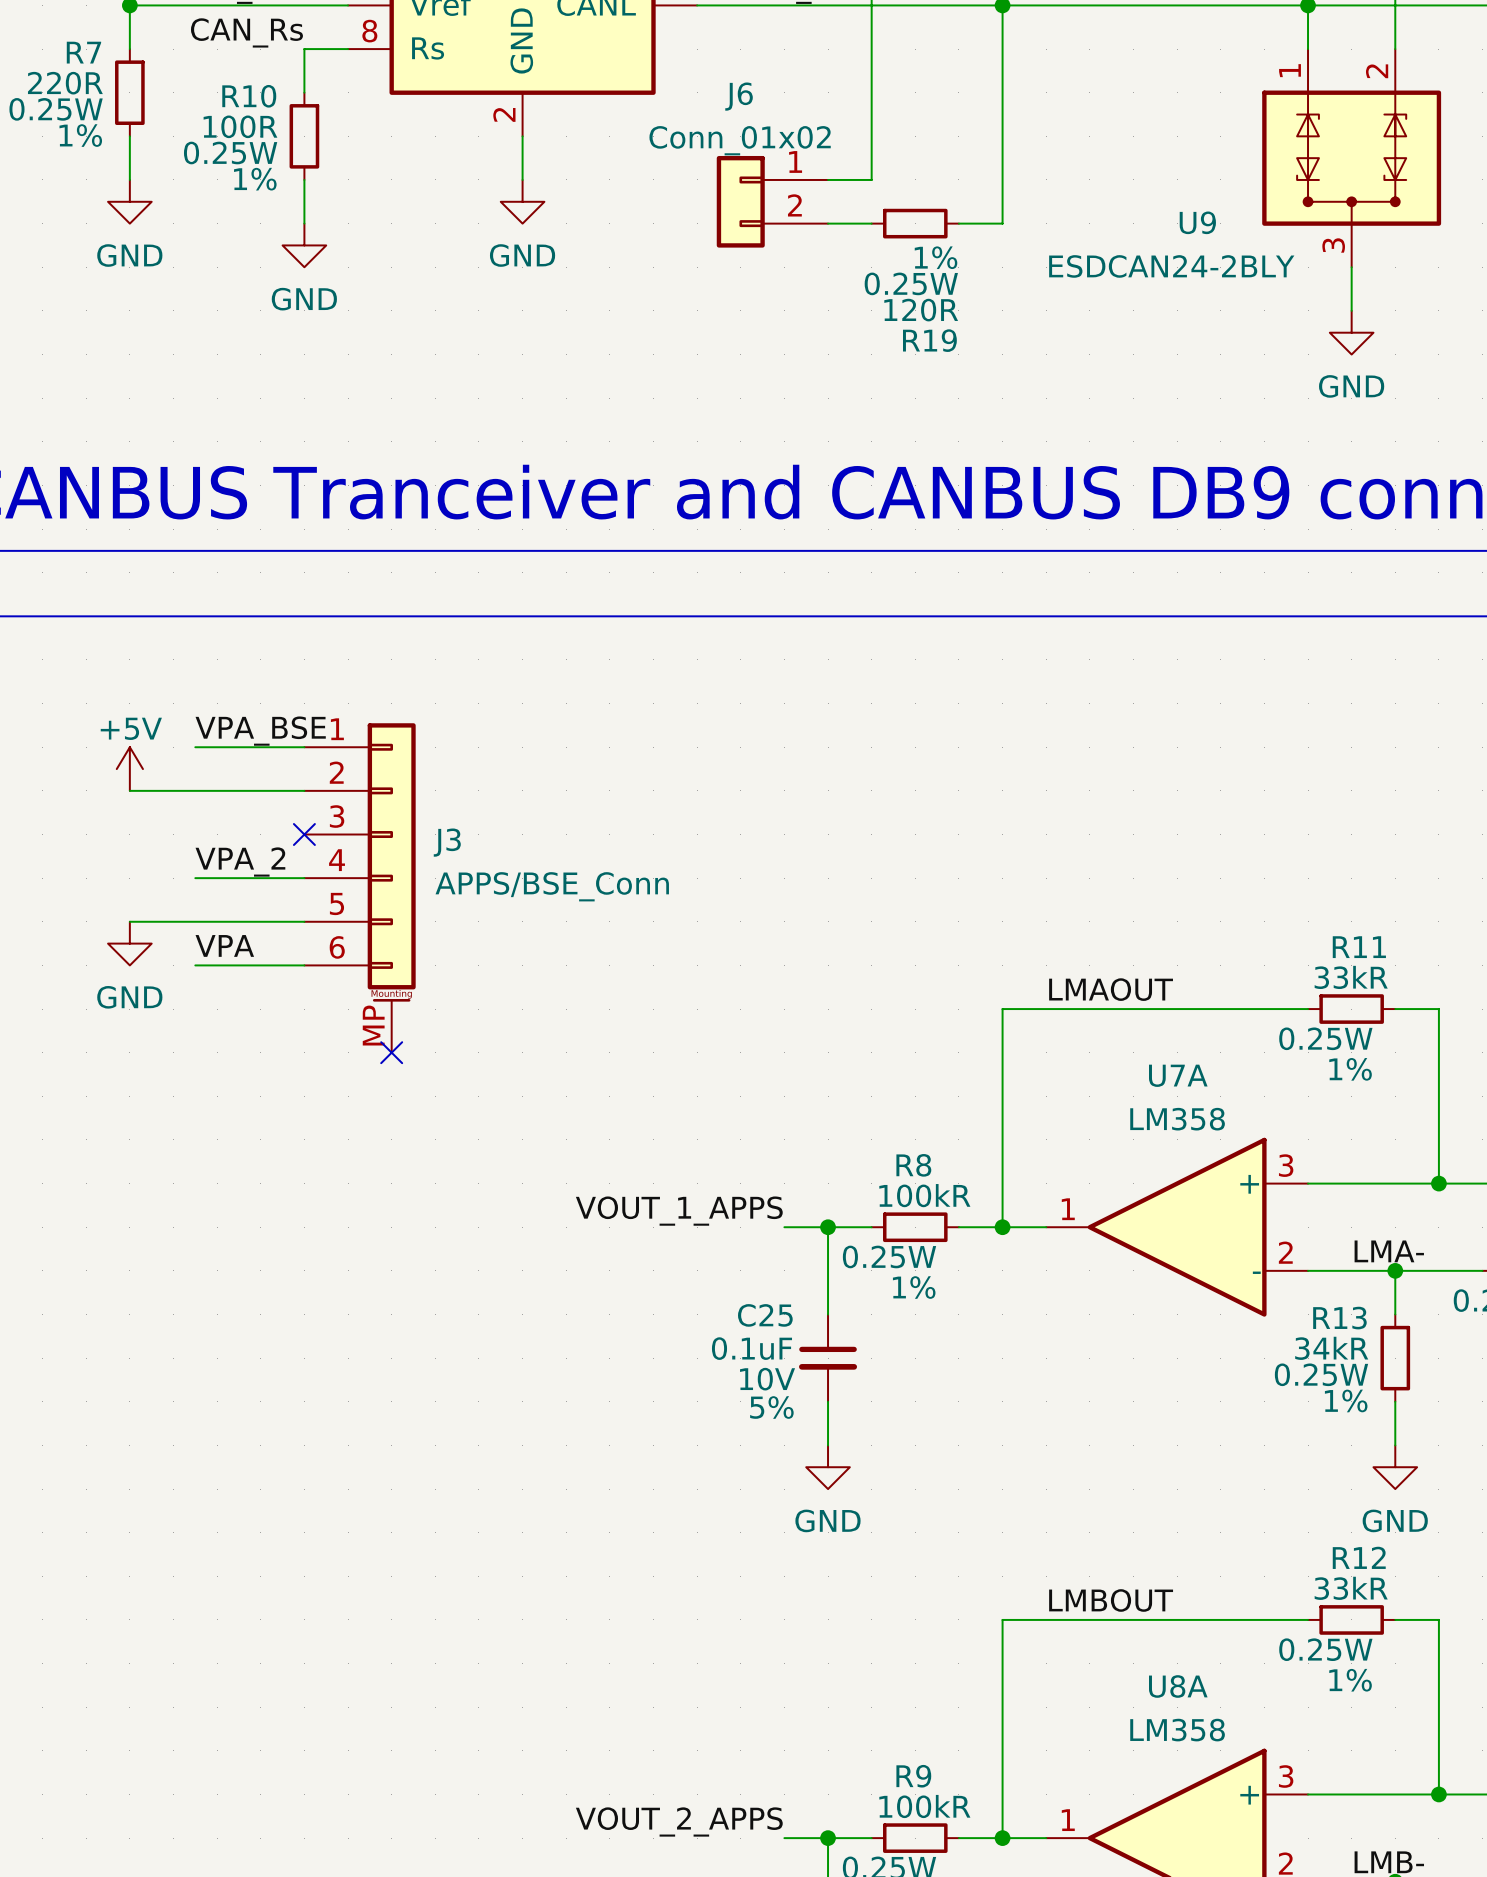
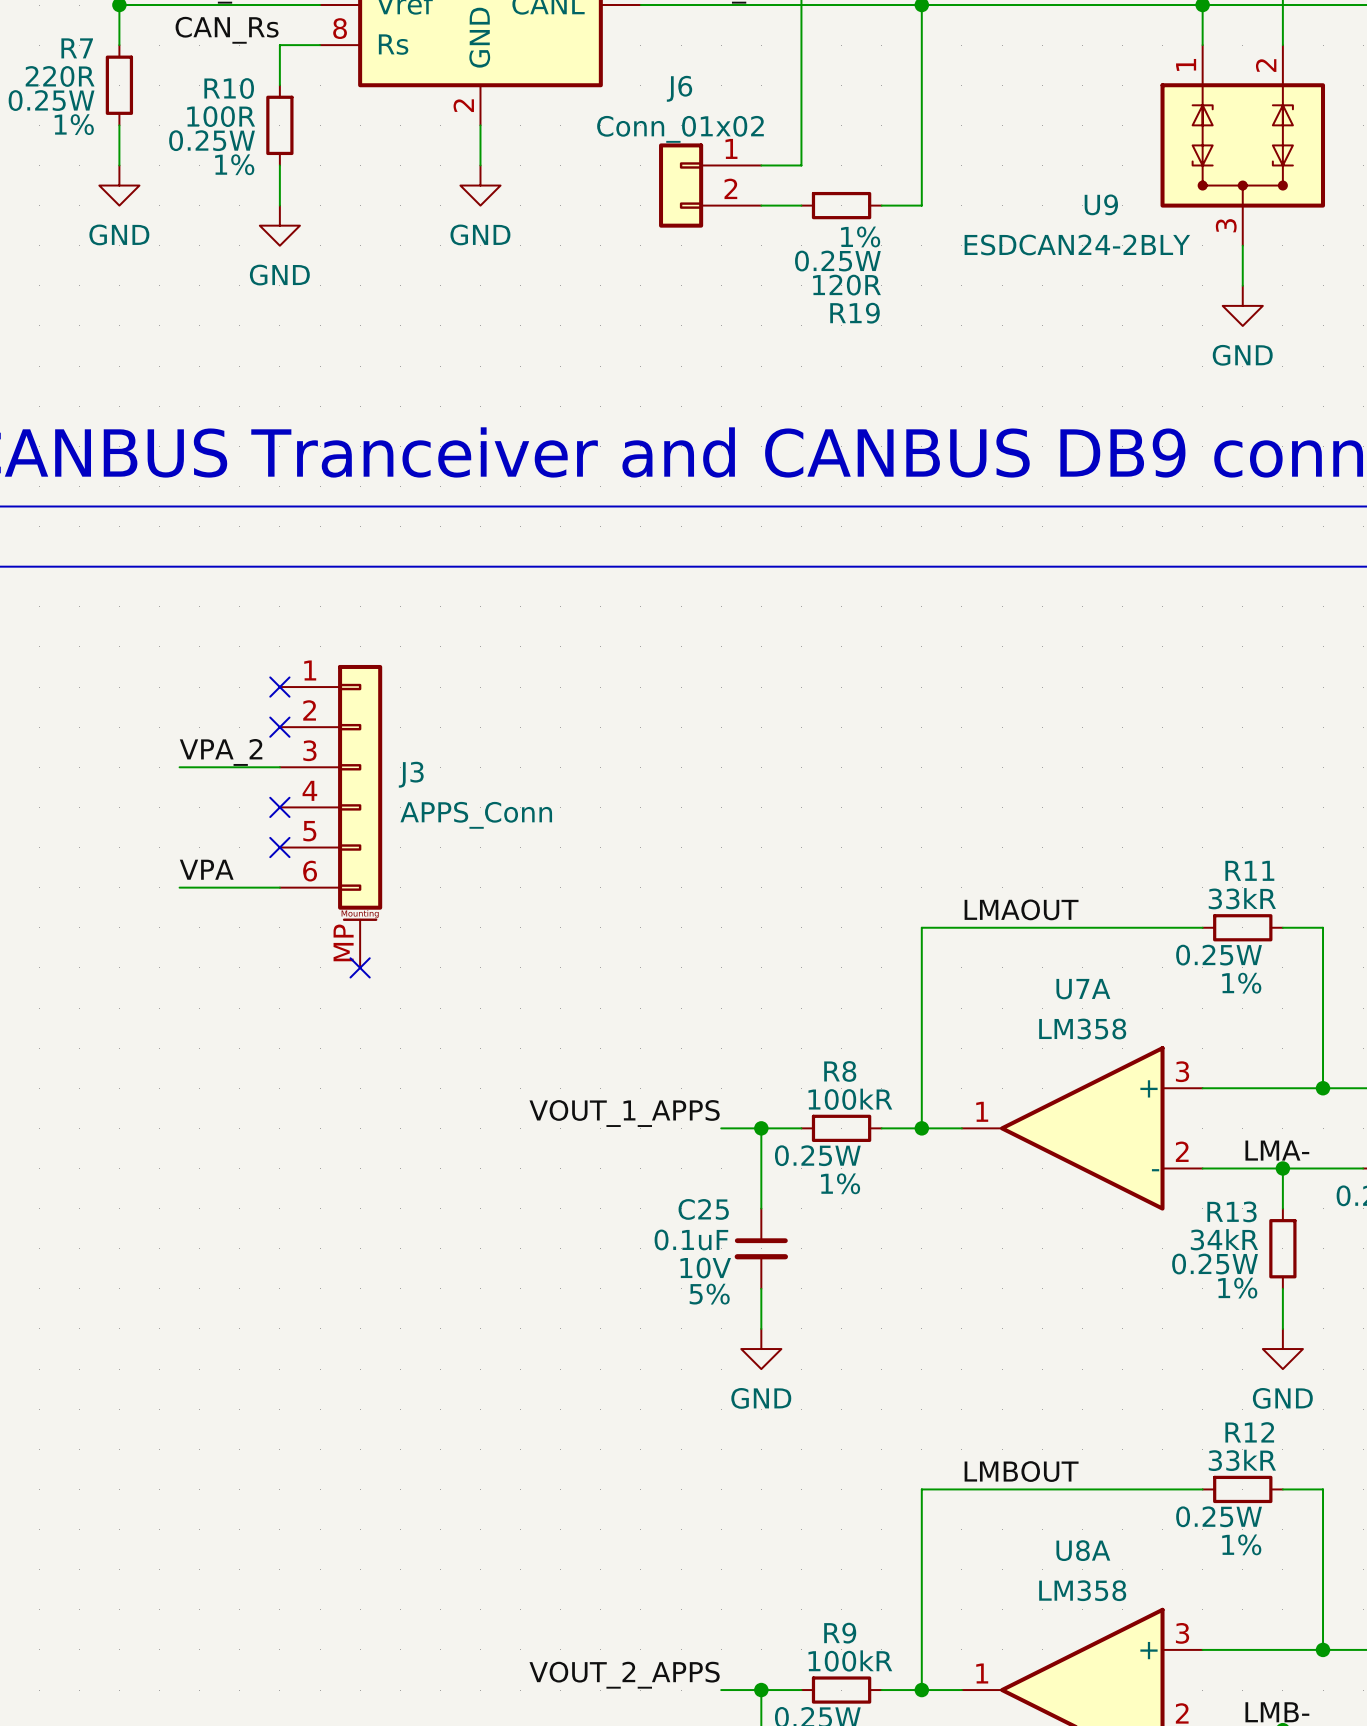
label: VPA_BSE (260, 731) -> none
wire: (195, 747) (304, 747) -> none
no-connect mark: none -> (279, 687)
power symbol: +5V (129, 769) -> none
wire: (129, 790) (304, 790) -> none
no-connect mark: none -> (279, 727)
no-connect mark: (304, 834) -> none
label position: VPA_2 (240, 862) -> VPA_2 (221, 752)
wire: (195, 878) (304, 878) -> (179, 767) (279, 767)
no-connect mark: none -> (279, 807)
J3 value: APPS/BSE_Conn (552, 886) -> APPS_Conn (476, 815)
wire: (129, 921) (304, 921) -> none
no-connect mark: none -> (279, 847)
power symbol: GND (129, 943) -> none

